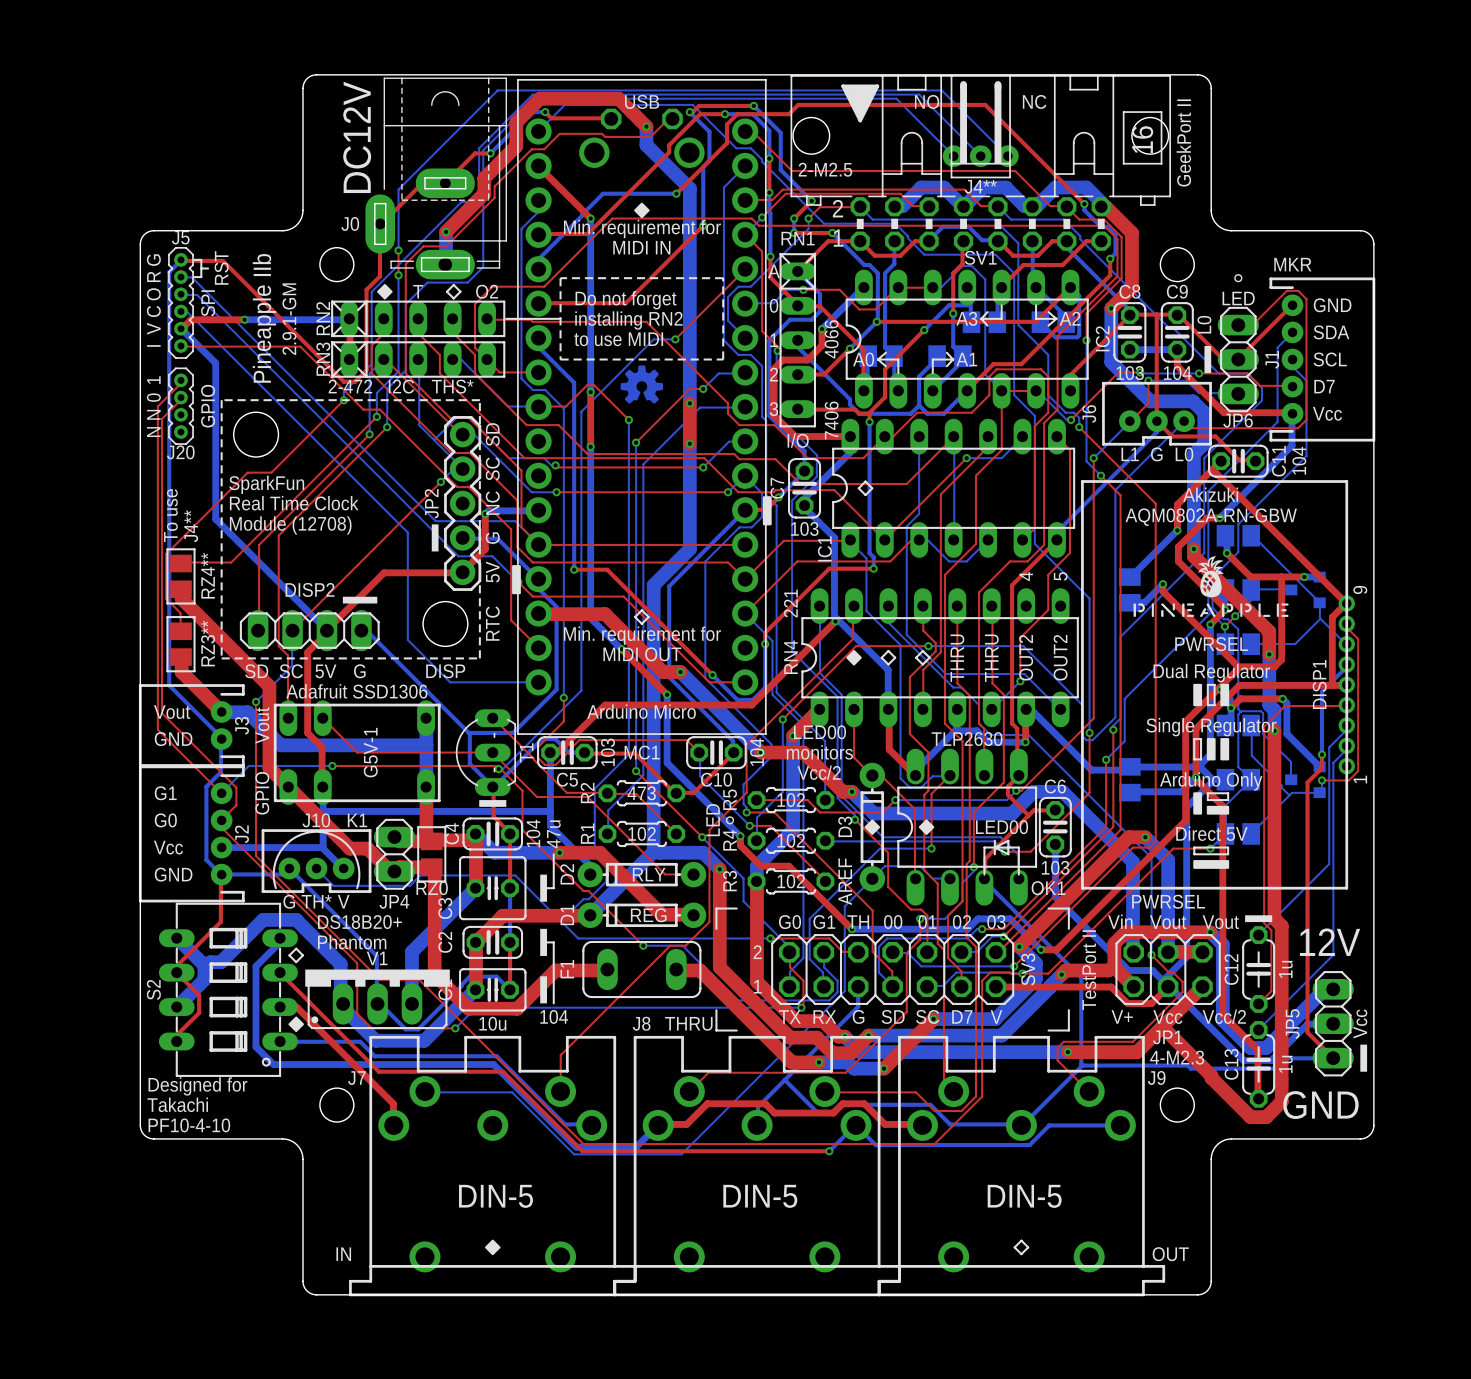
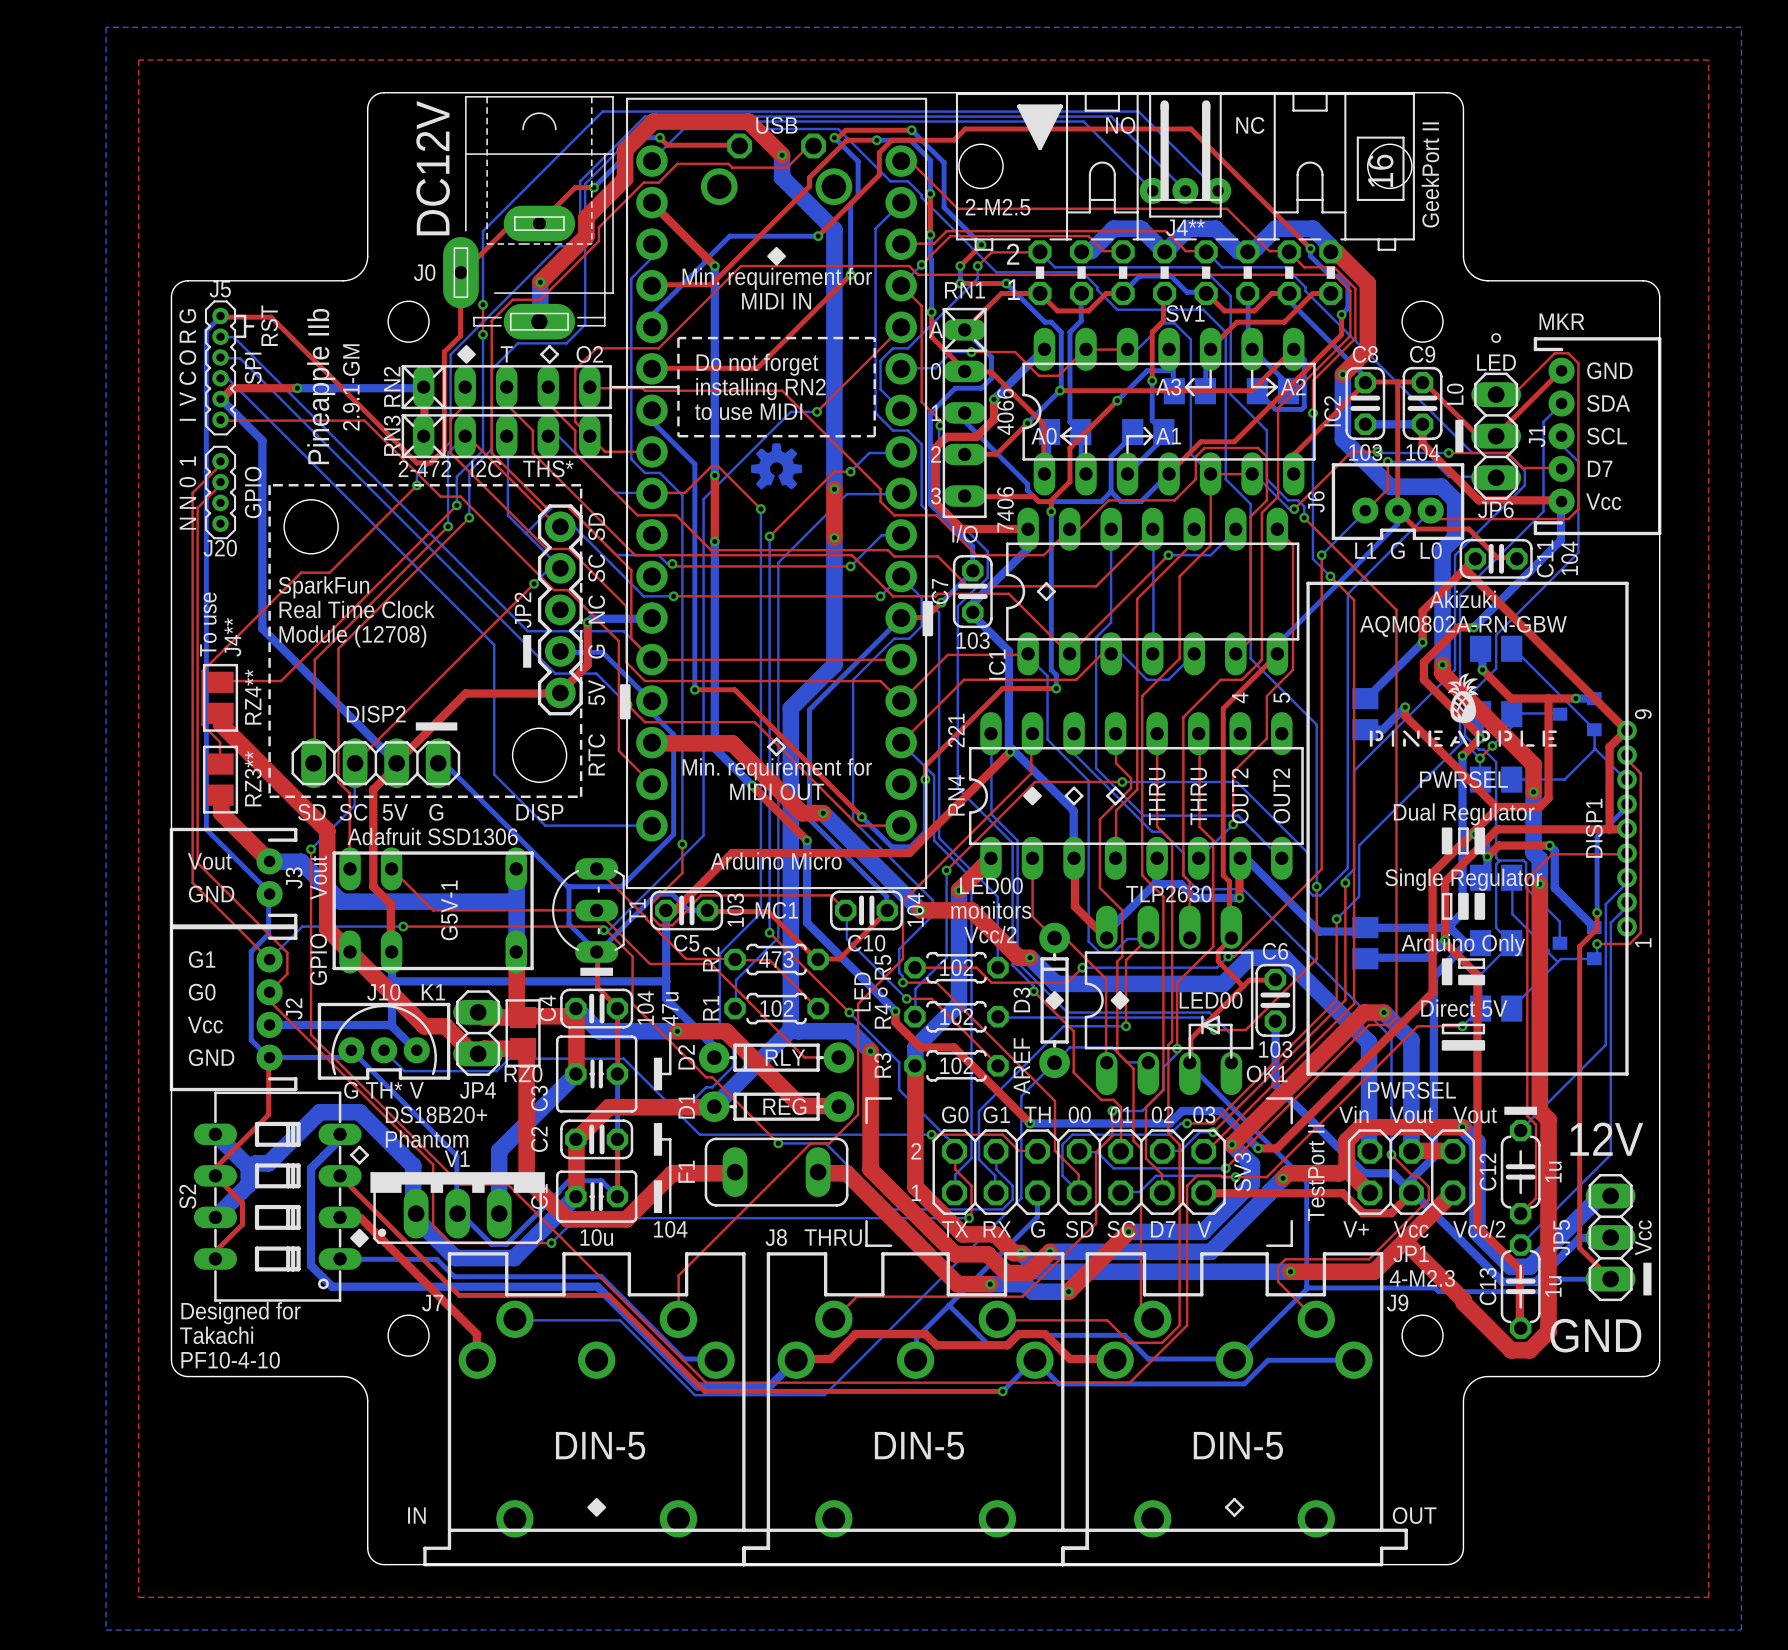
bottom zone outline: none -> (106, 27) (1741, 27) (1741, 1630) (106, 1630) (106, 27)
top zone outline: none -> (138, 60) (1708, 60) (1708, 1597) (138, 1597) (138, 60)

